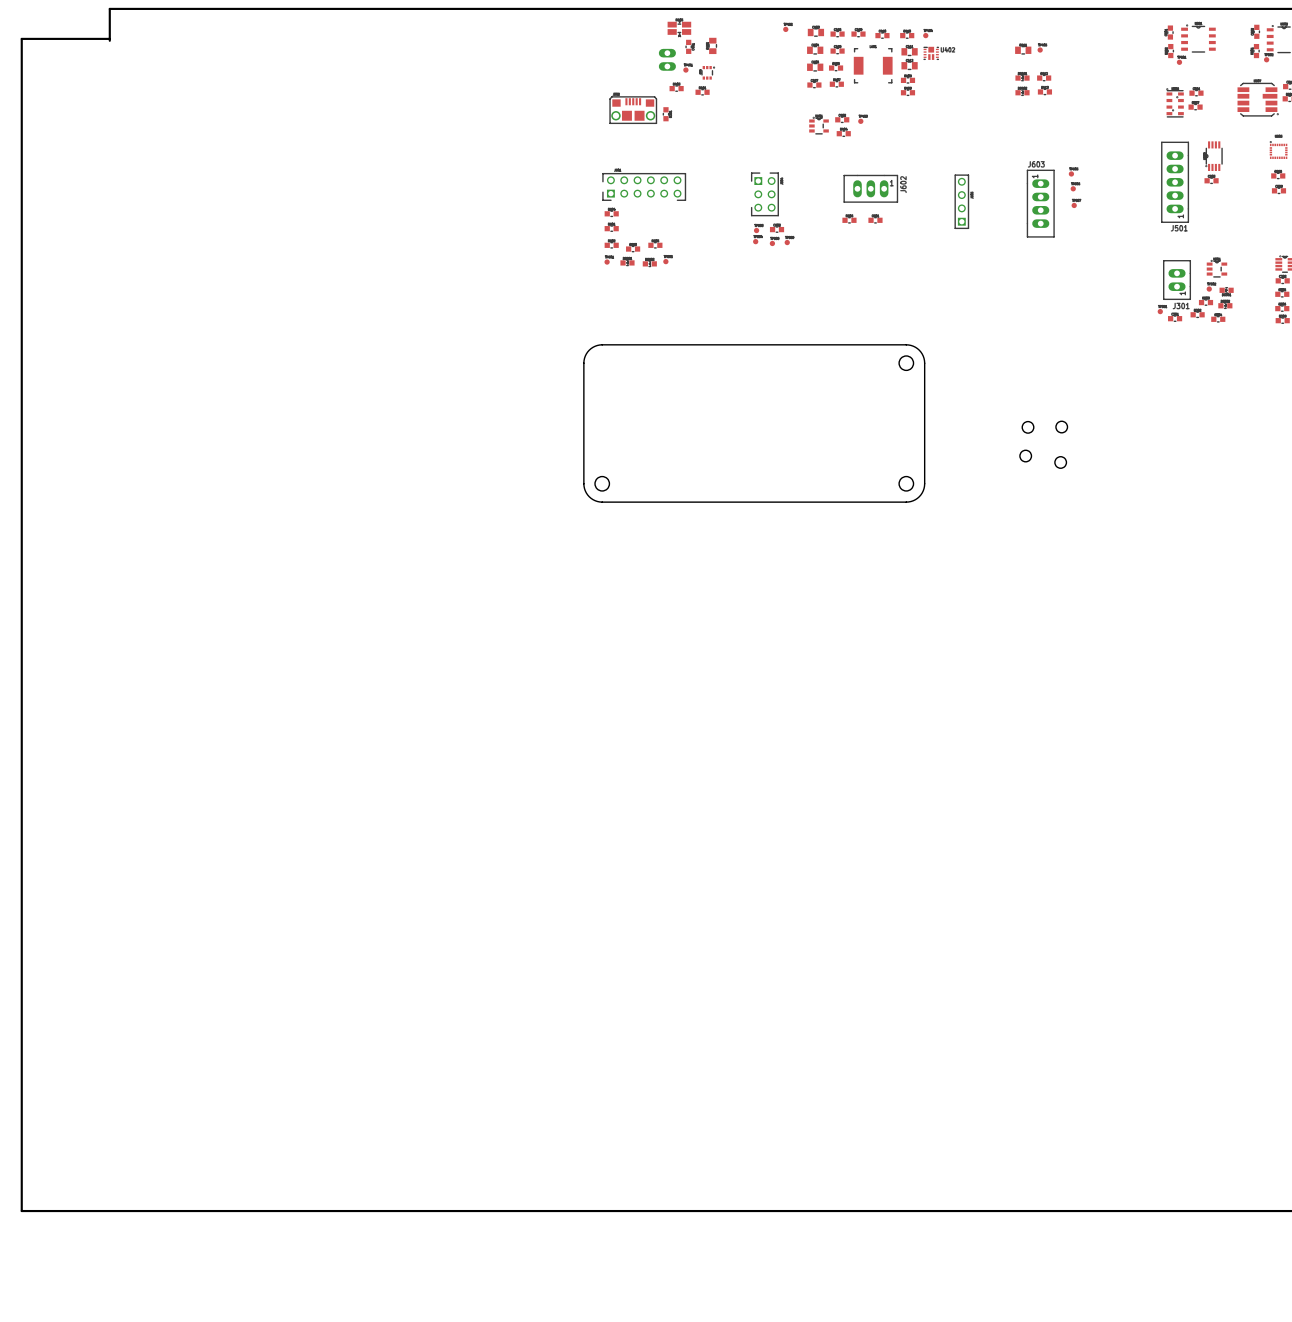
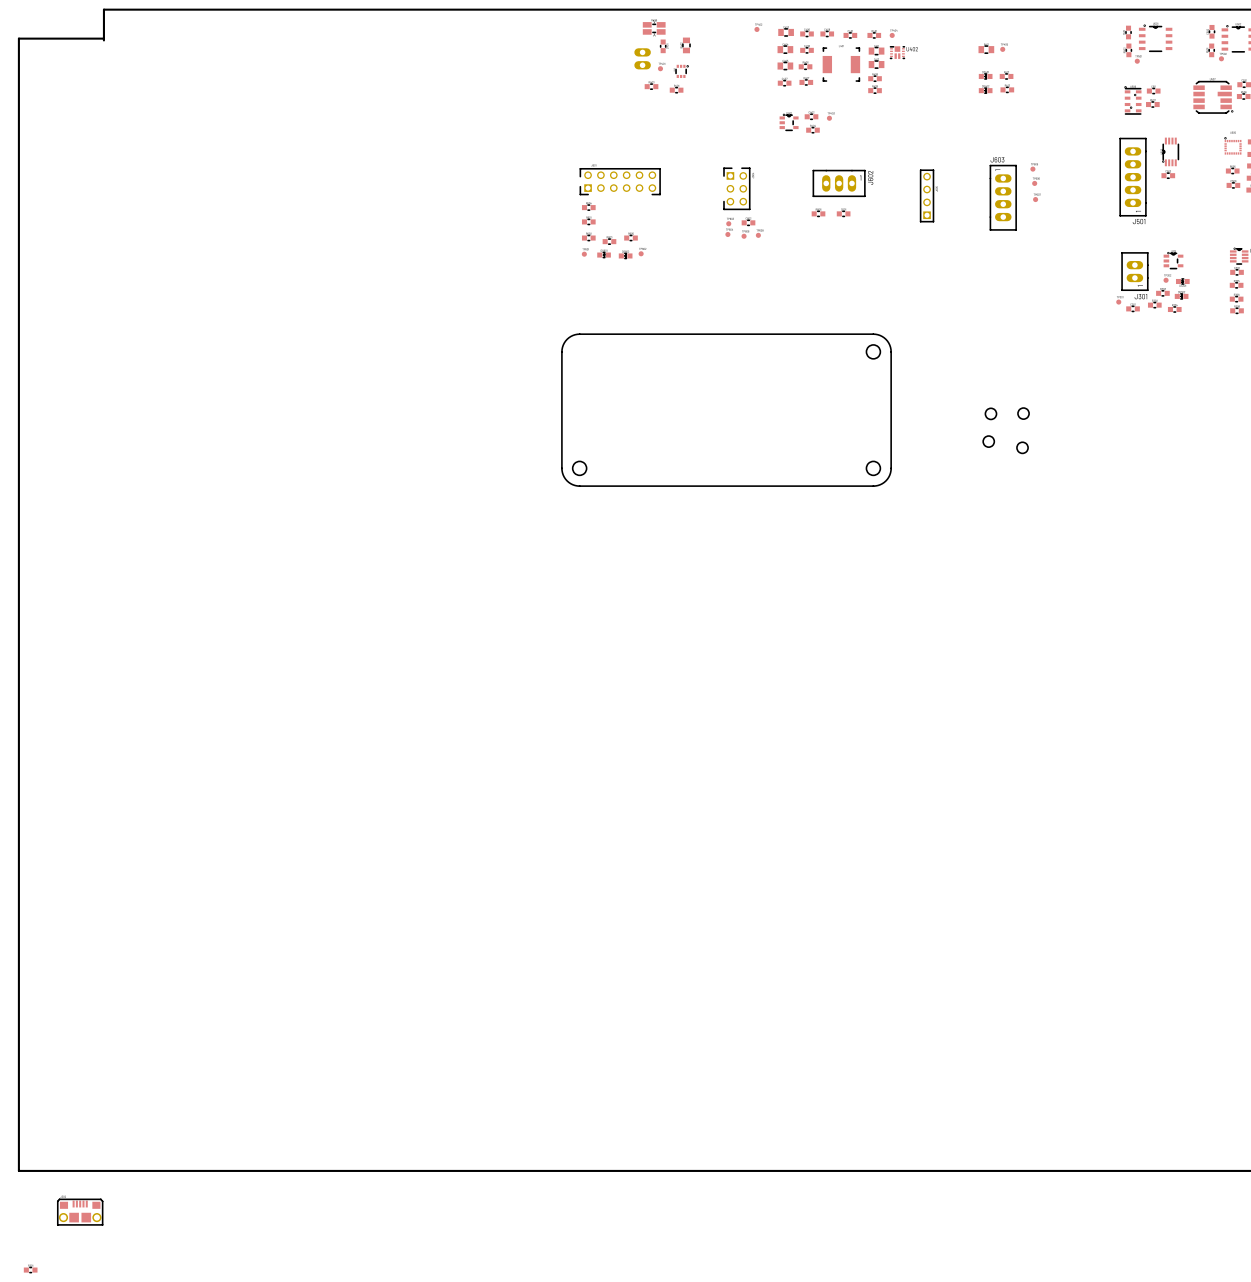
part position: (633, 110) -> (80, 1212)
part rotation: 0° (665, 114) -> 90° clockwise (30, 1270)
part position: (665, 114) -> (30, 1270)

